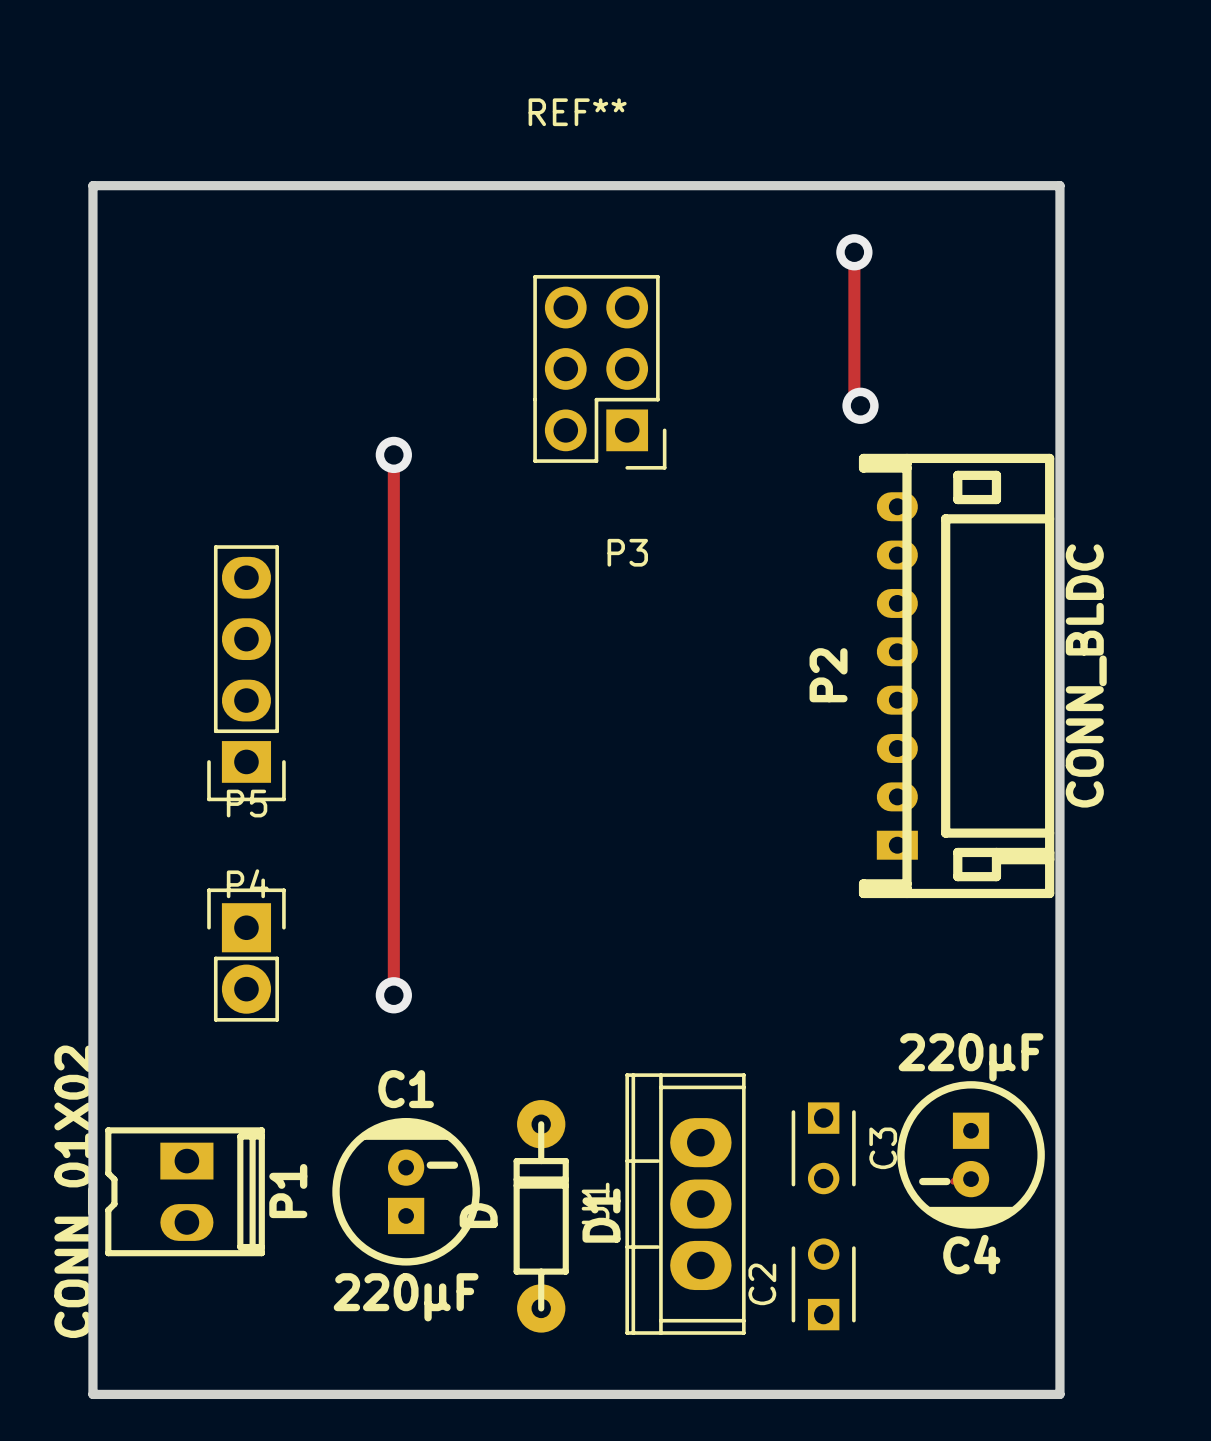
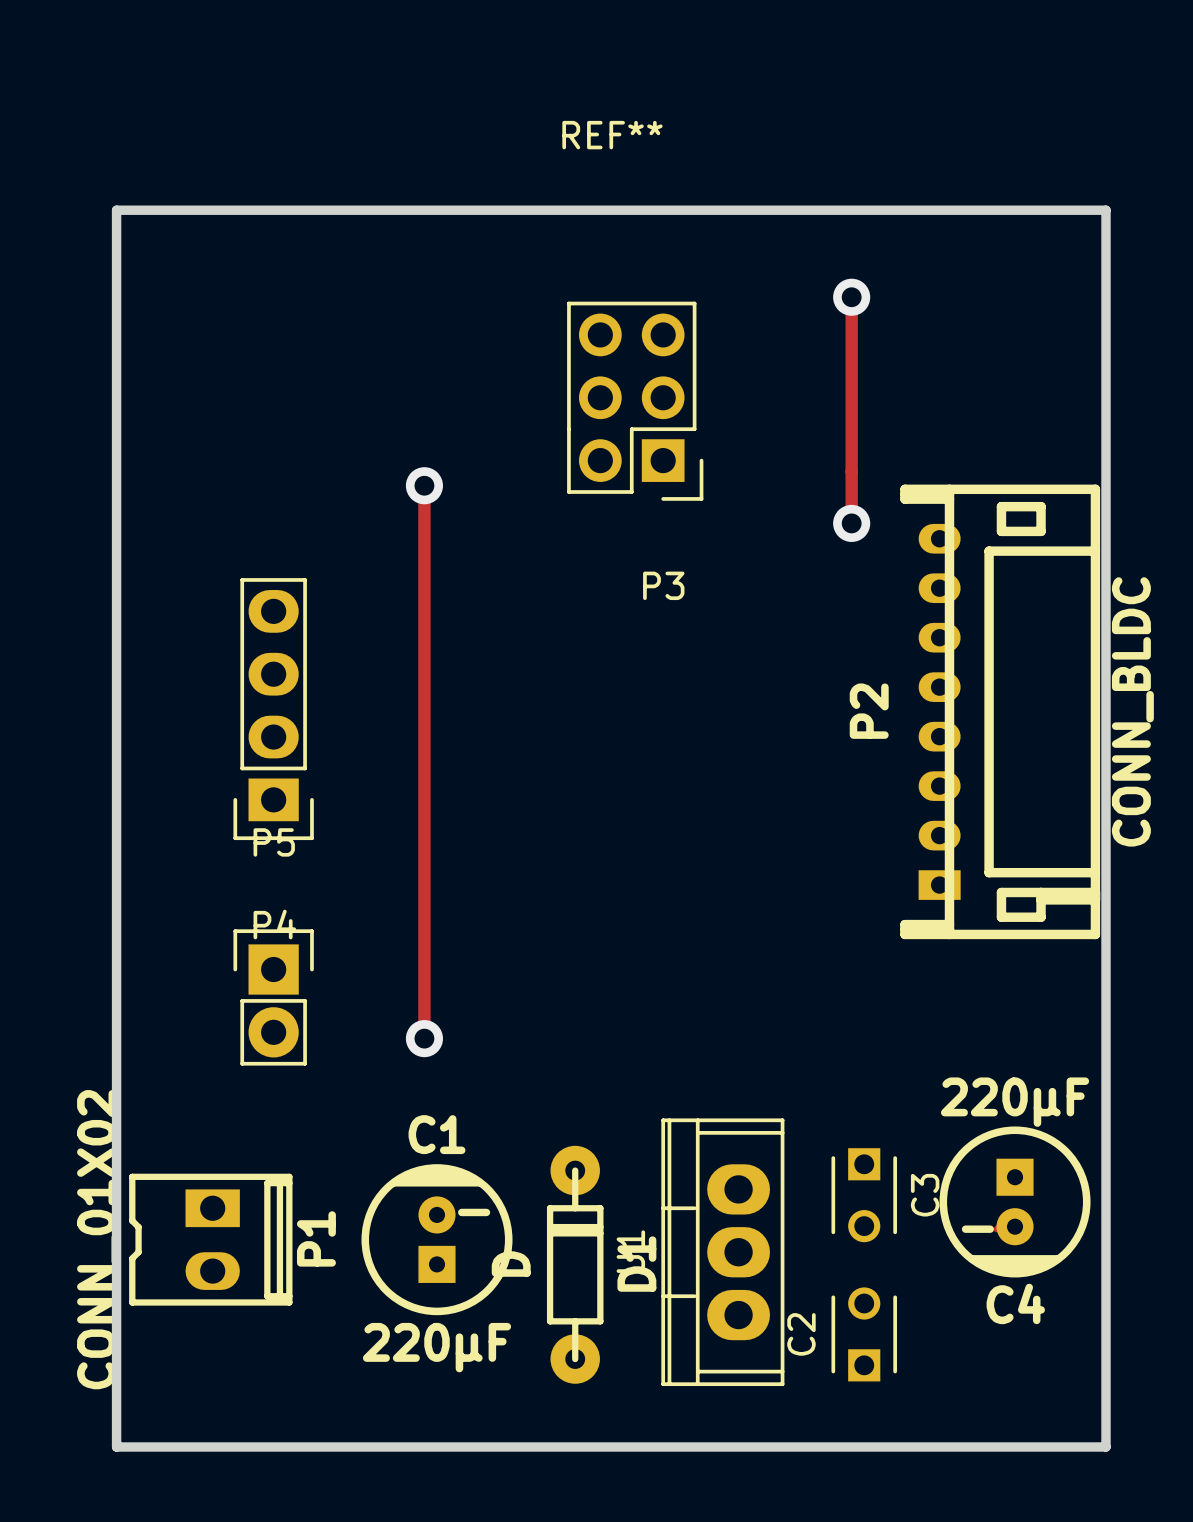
track: (854, 252) (854, 399) (860, 405) -> none
via position: (854, 252) -> (851, 297)
track: none -> (851, 297) (851, 523)
via: (860, 405) -> none
via: none -> (851, 523)

